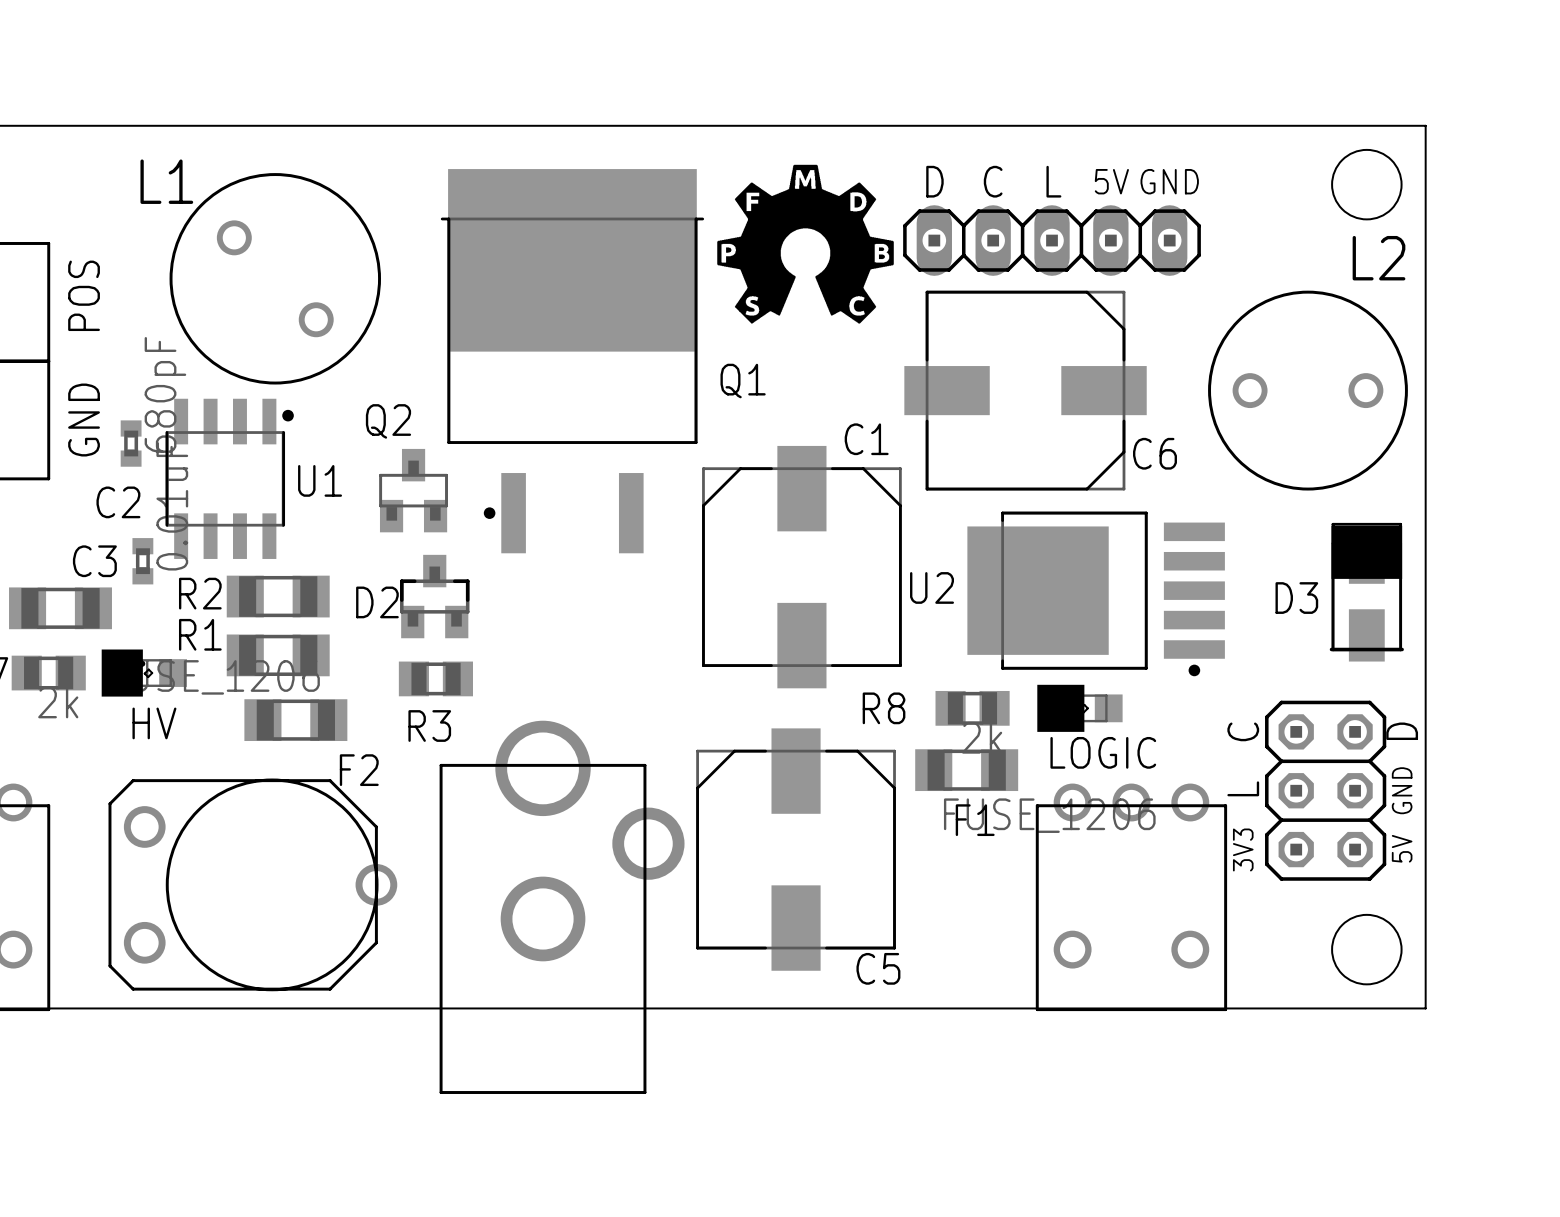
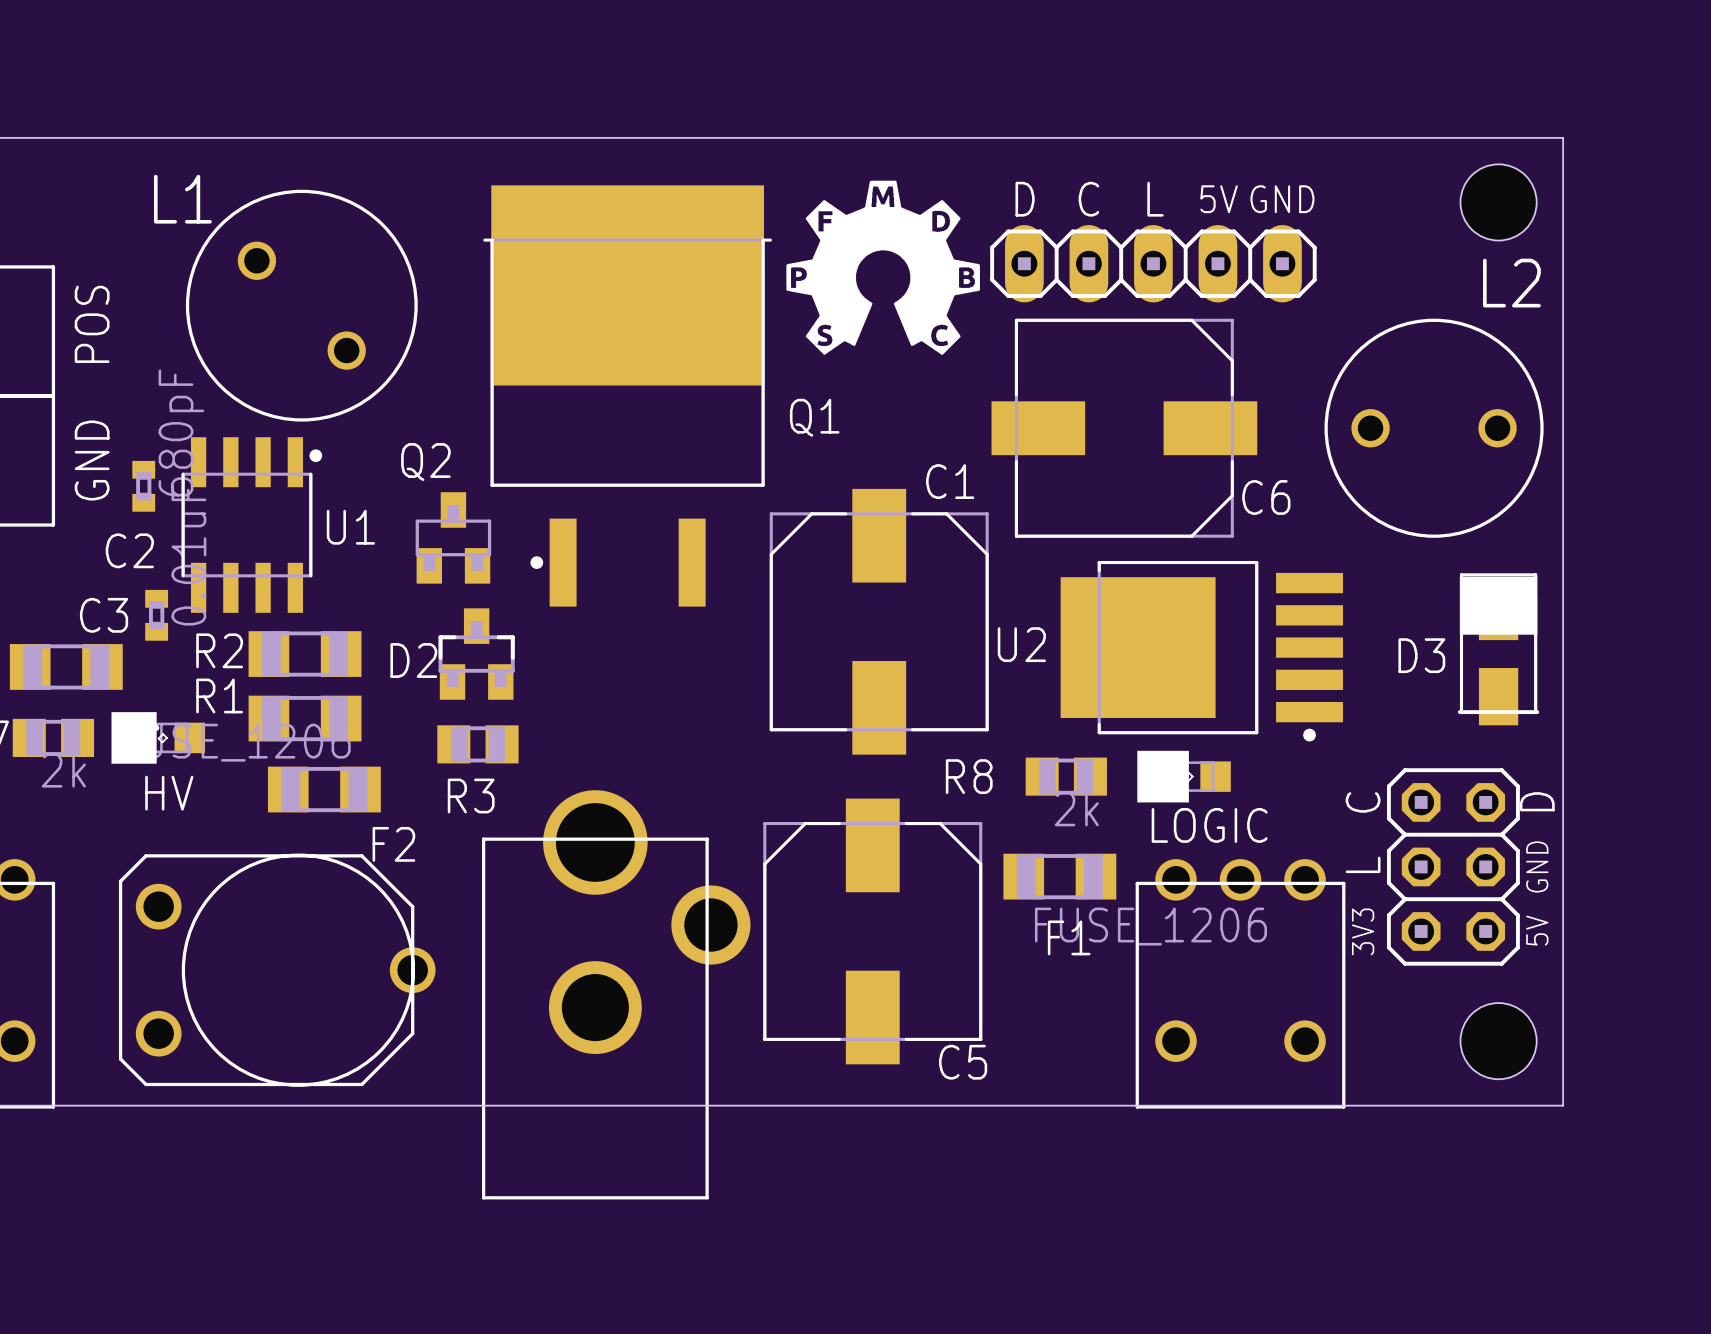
F1 position: (966, 770) -> (1059, 876)
F1 name position: F1 (975, 820) -> F1 (1069, 937)

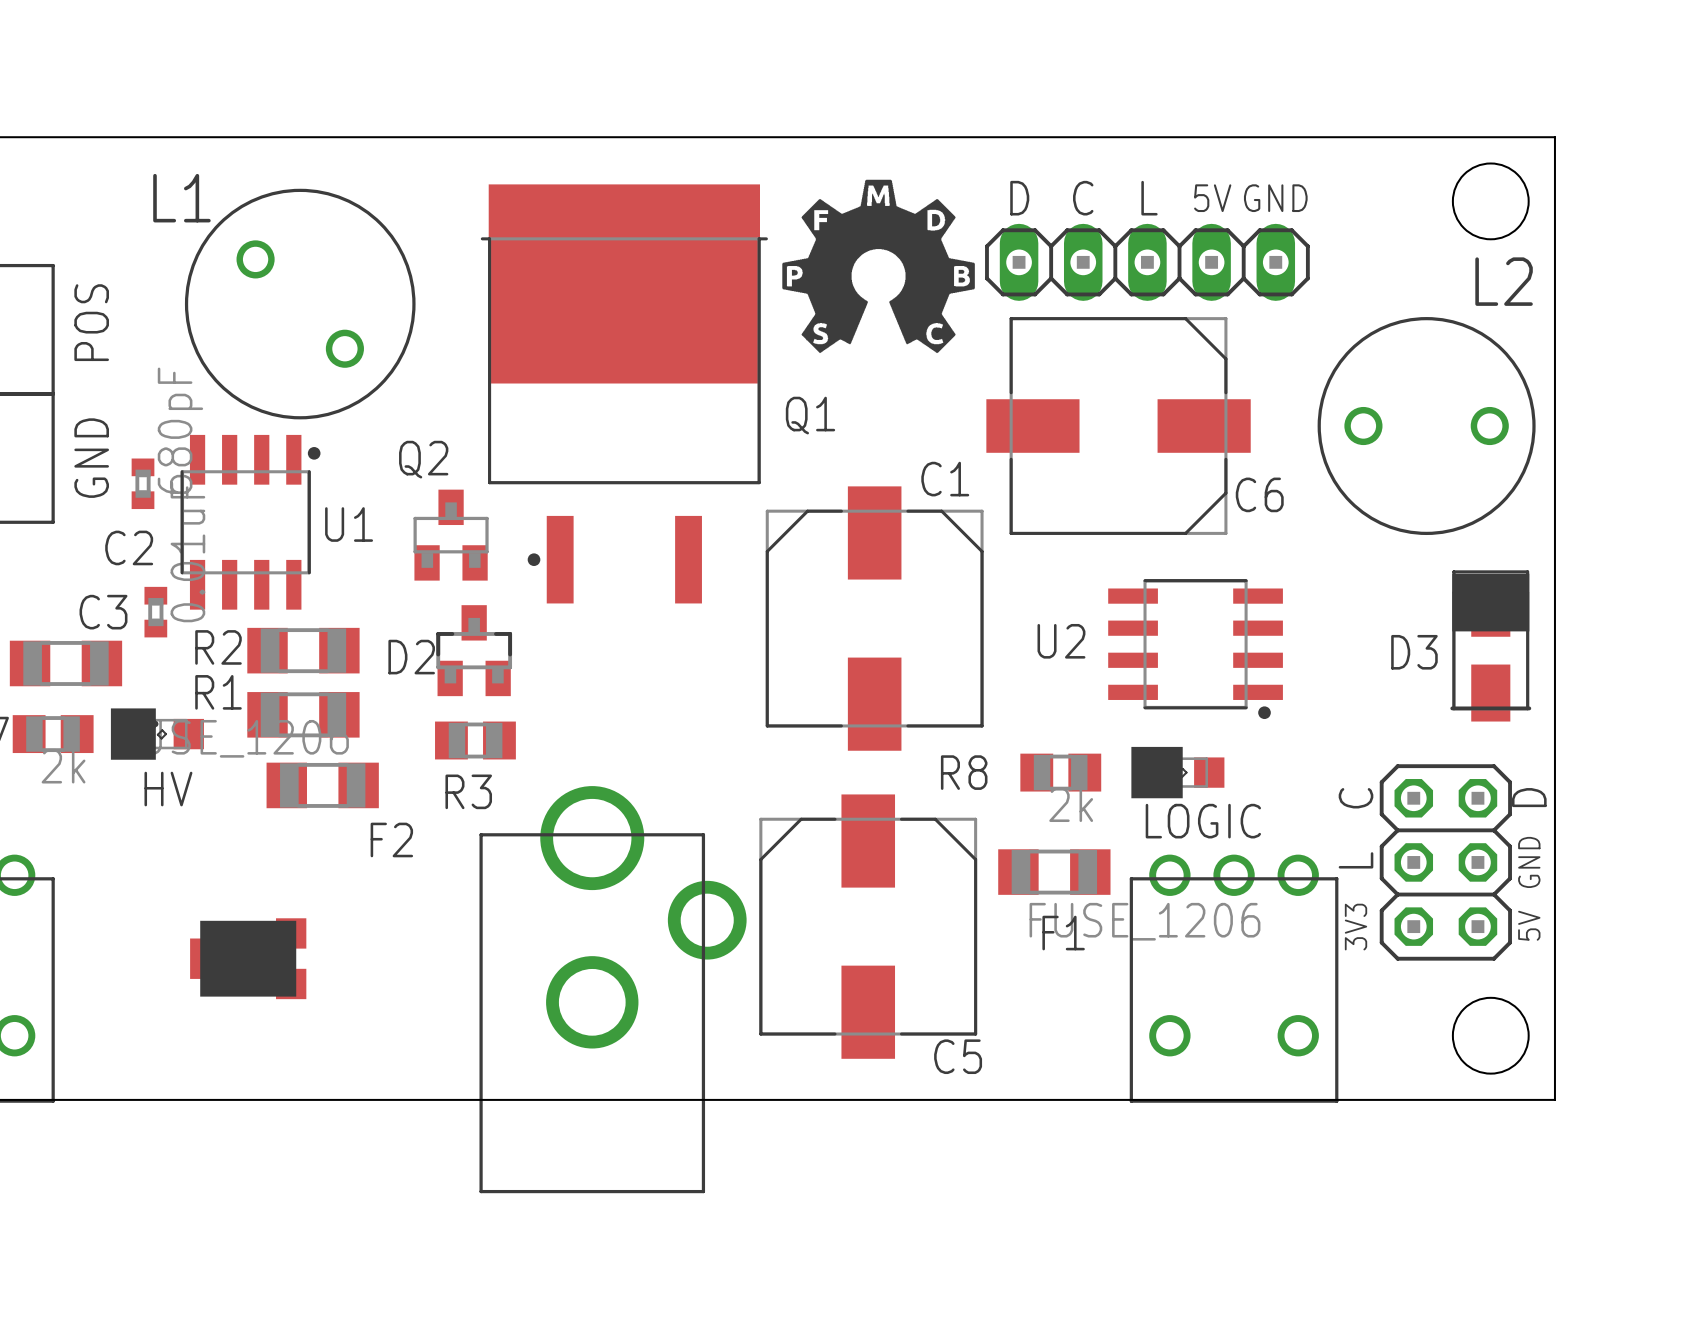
U2 footprint: [1060, 560, 1343, 742] -> [1108, 579, 1283, 720]
part: none -> (248, 958)
part: (277, 970) -> none

